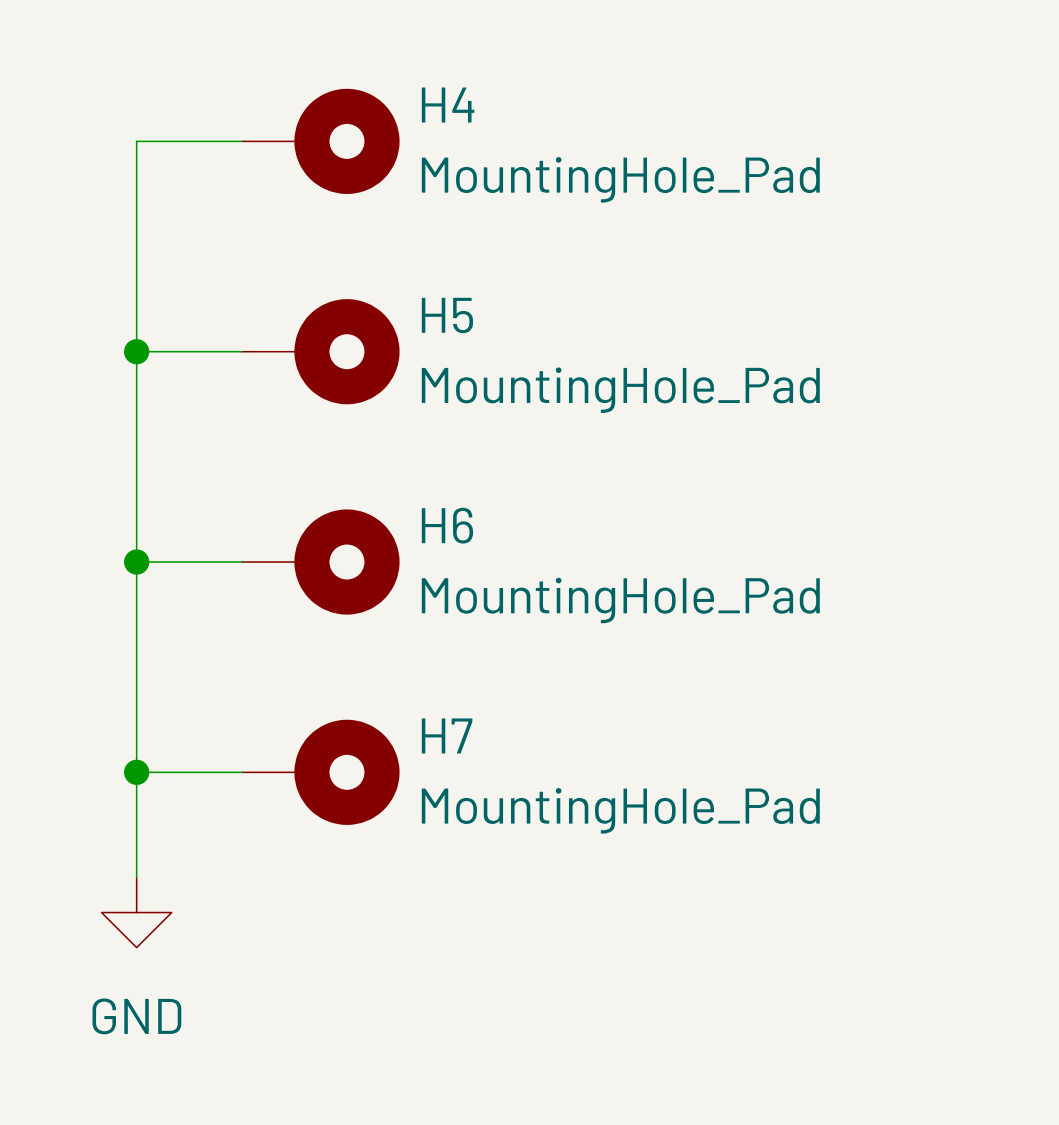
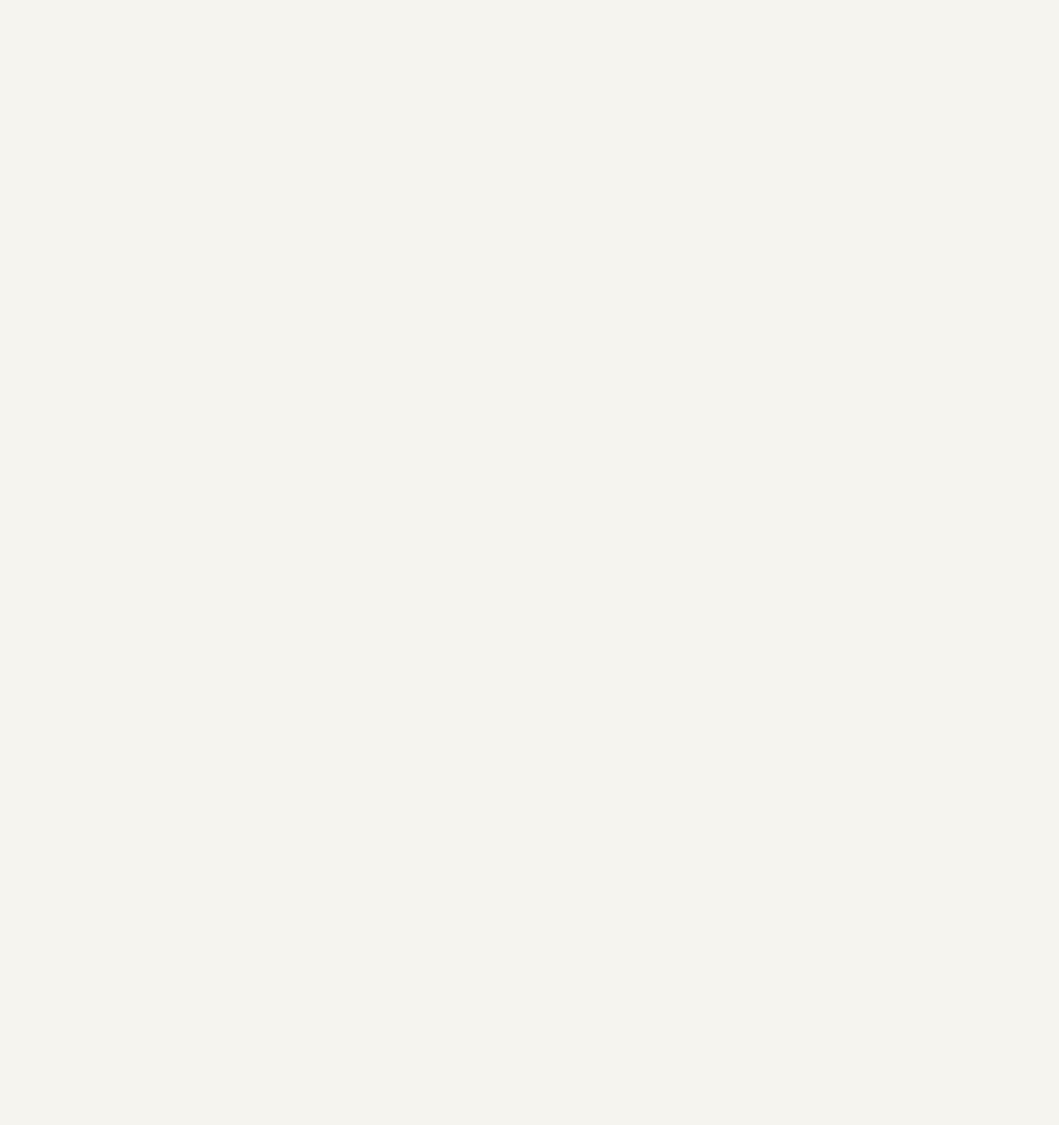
wire: (241, 141) (136, 141) (136, 877) -> none
H4: MountingHole_Pad (320, 141) -> none
wire: (136, 351) (241, 351) -> none
junction: (136, 351) -> none
H5: MountingHole_Pad (320, 351) -> none
wire: (136, 562) (241, 562) -> none
junction: (136, 562) -> none
H6: MountingHole_Pad (320, 562) -> none
wire: (136, 772) (241, 772) -> none
junction: (136, 772) -> none
H7: MountingHole_Pad (320, 772) -> none
power symbol: GND (136, 912) -> none

